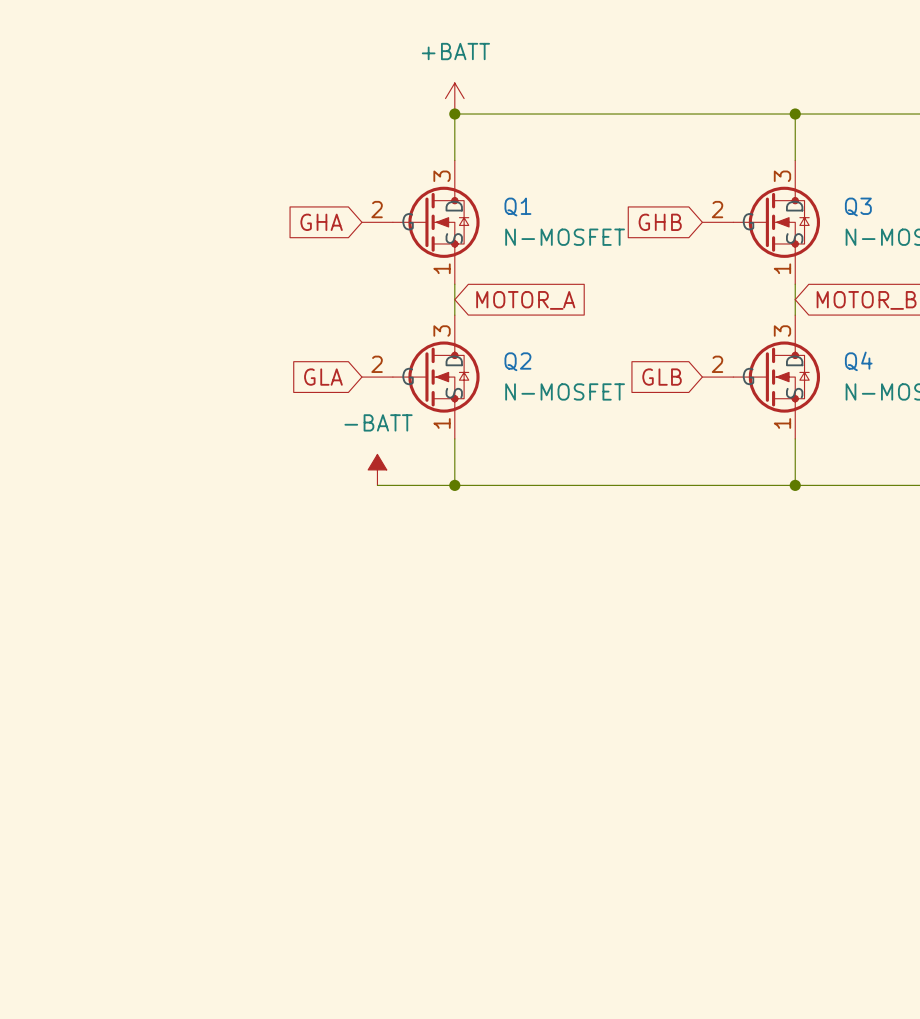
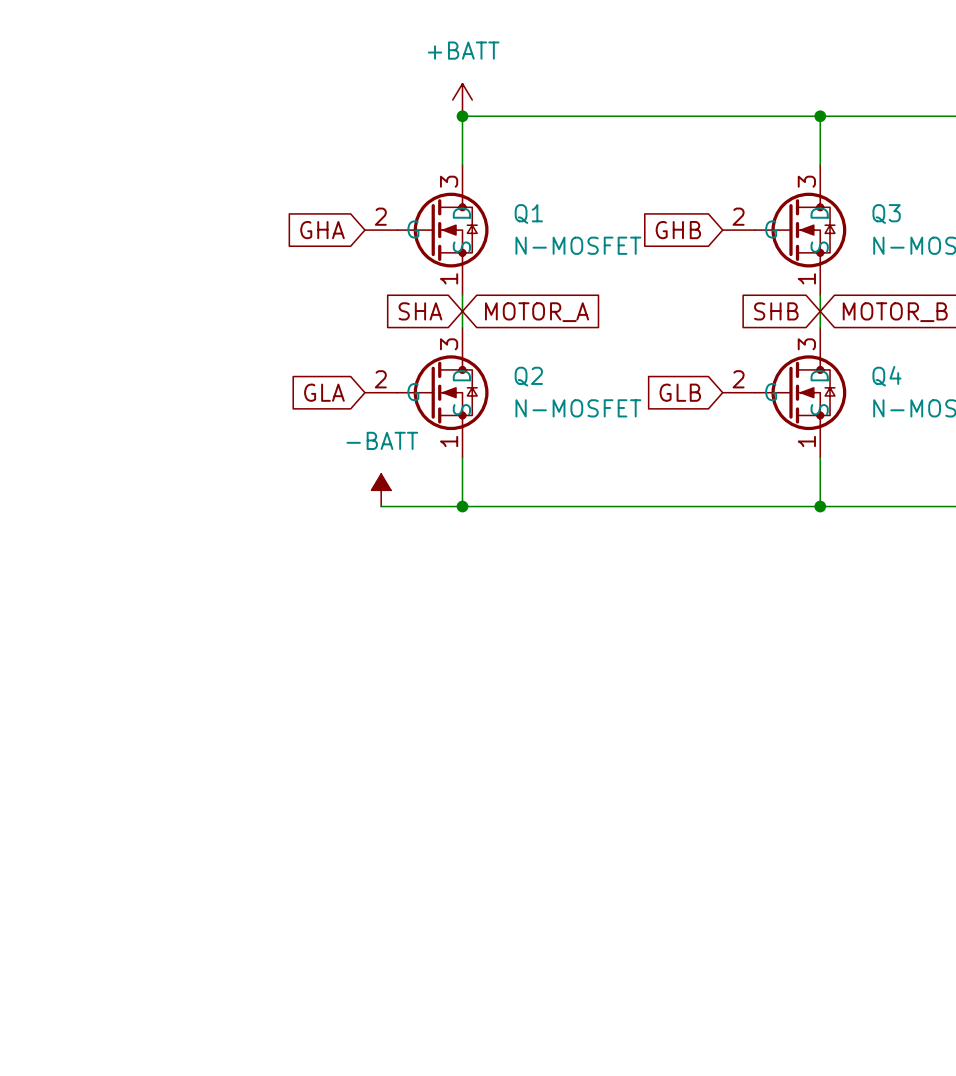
global label: none -> SHA (420, 311)
global label: none -> SHB (776, 311)

